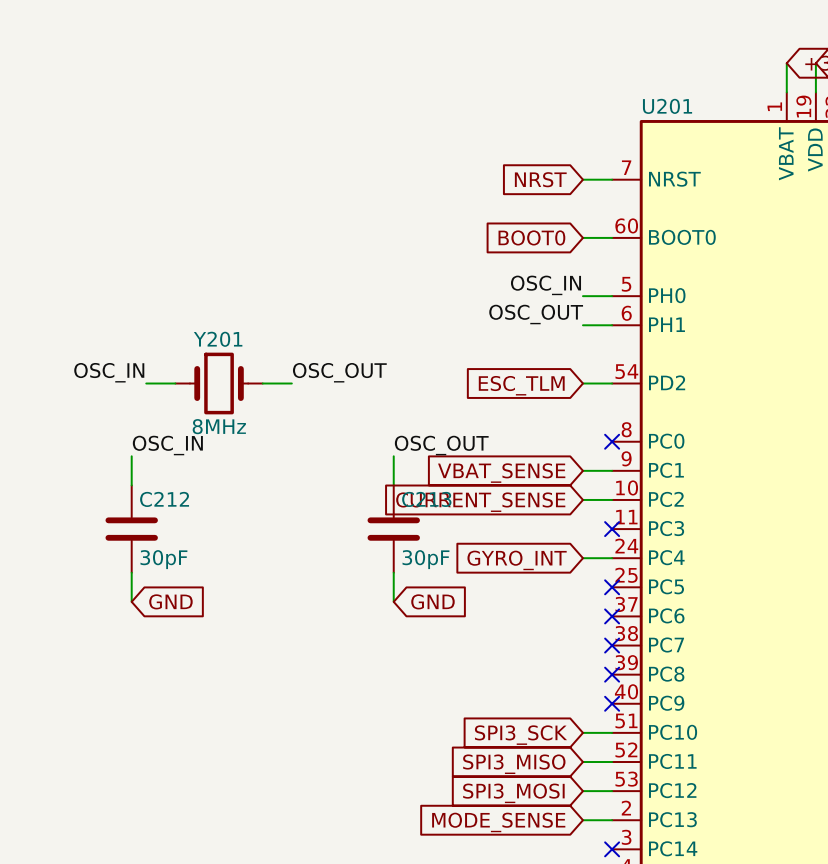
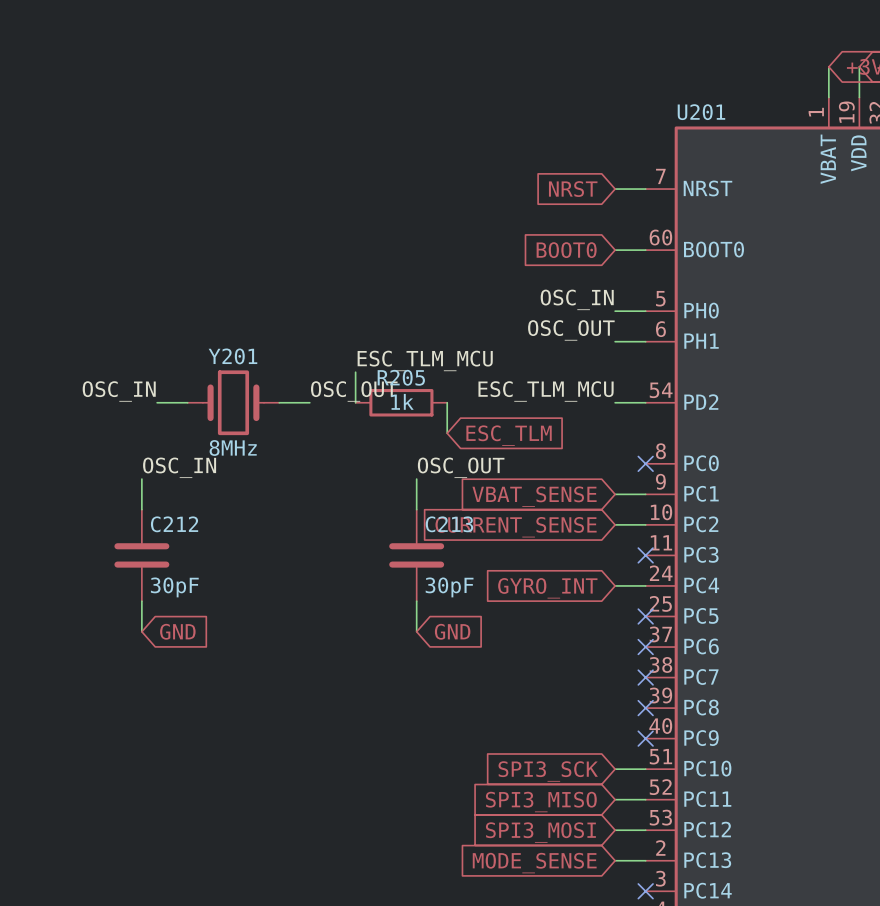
label: none -> ESC_TLM_MCU (425, 360)
wire: none -> (355, 372) (355, 402)
label: none -> ESC_TLM_MCU (546, 391)
R205: none -> 1k (401, 402)
wire: none -> (447, 402) (447, 433)
global label rotation: 0° (521, 385) -> 180° (509, 435)

